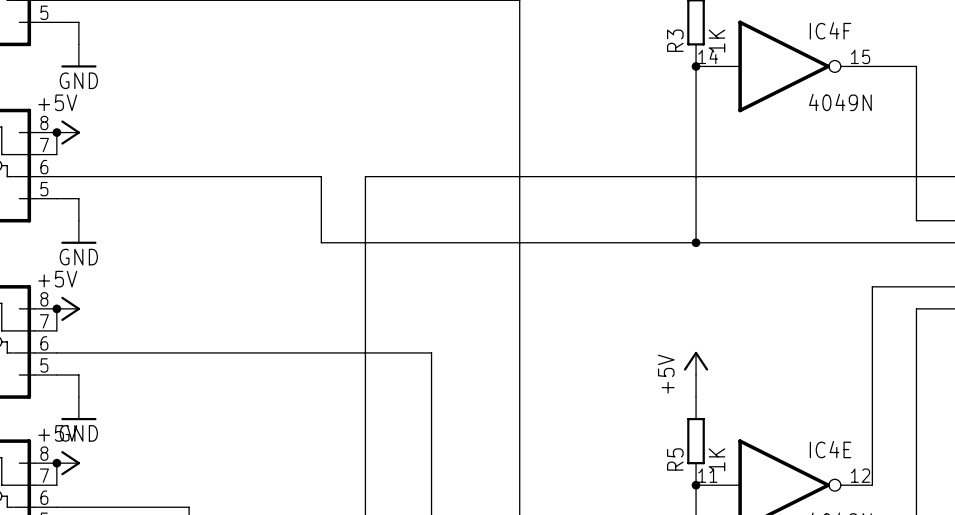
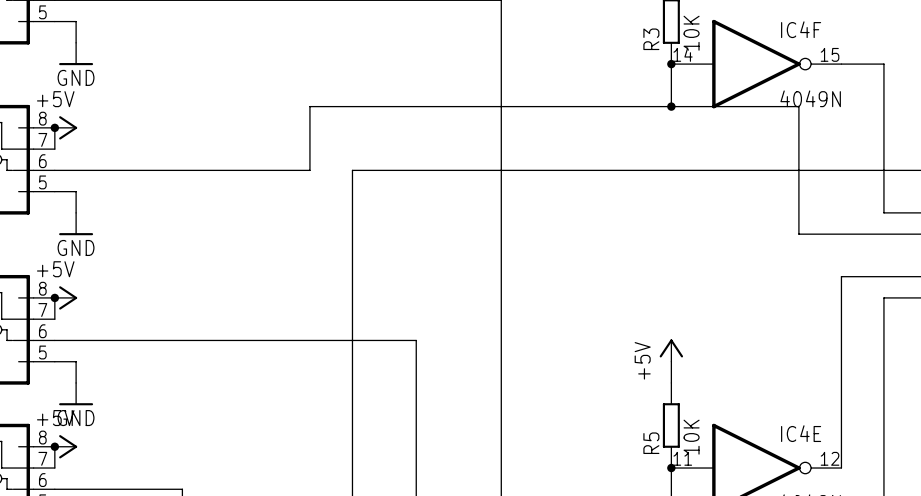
R3 value: 1K (716, 41) -> 10K (691, 33)
wire: (696, 110) (696, 242) -> none
junction: none -> (671, 106)
wire: (321, 176) (321, 242) (828, 242) -> (309, 170) (309, 106) (798, 106) (798, 234)
junction: (696, 242) -> none
R5 value: 1K (716, 459) -> 10K (691, 437)

